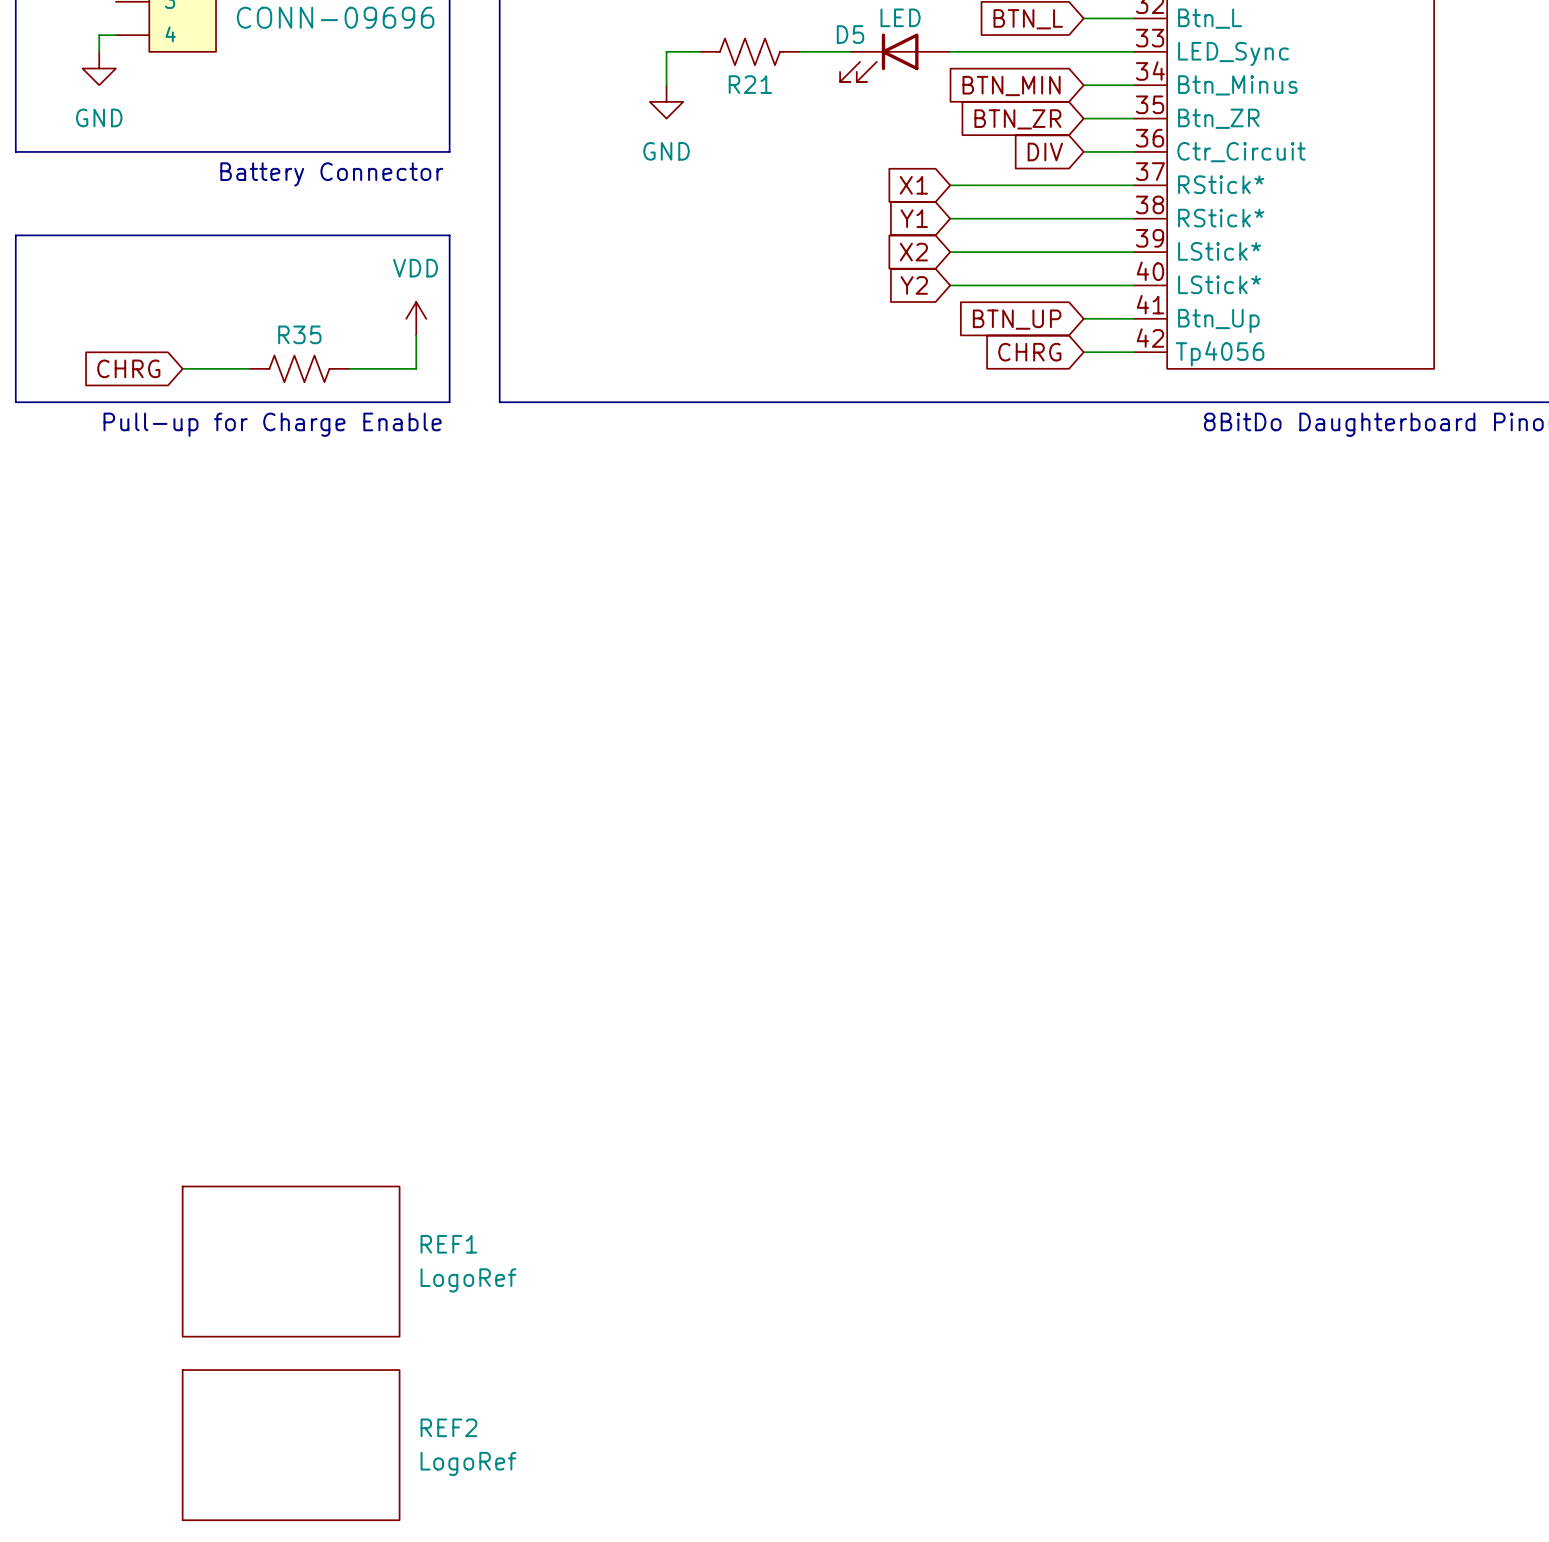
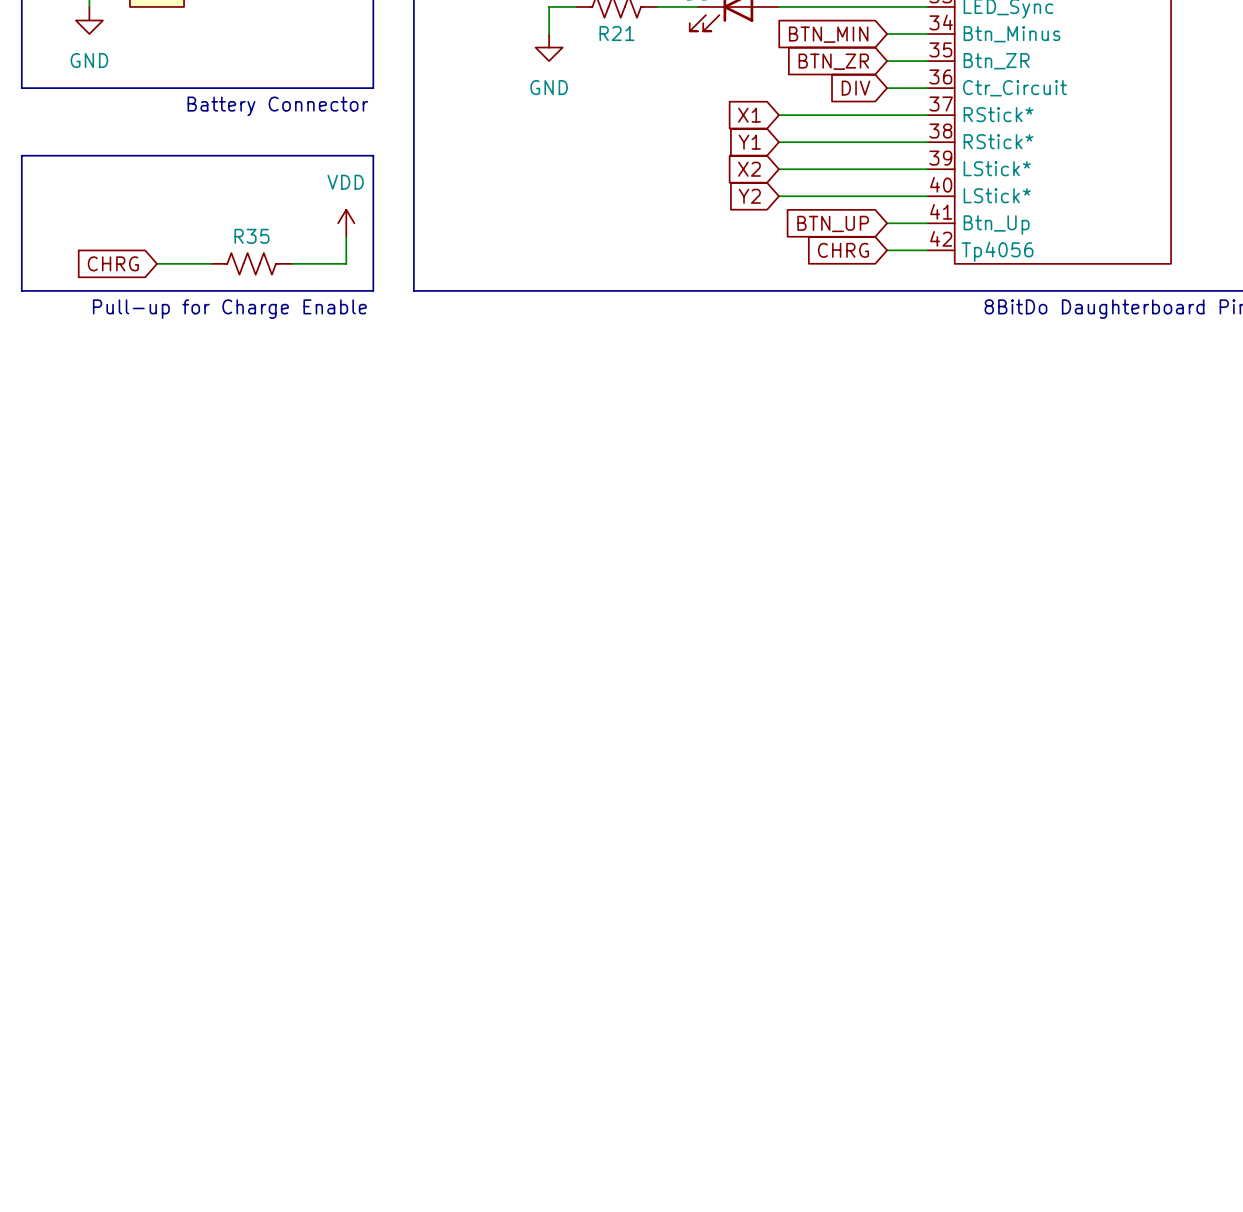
REF1: LogoRef (291, 1261) -> none
REF2: LogoRef (291, 1445) -> none

